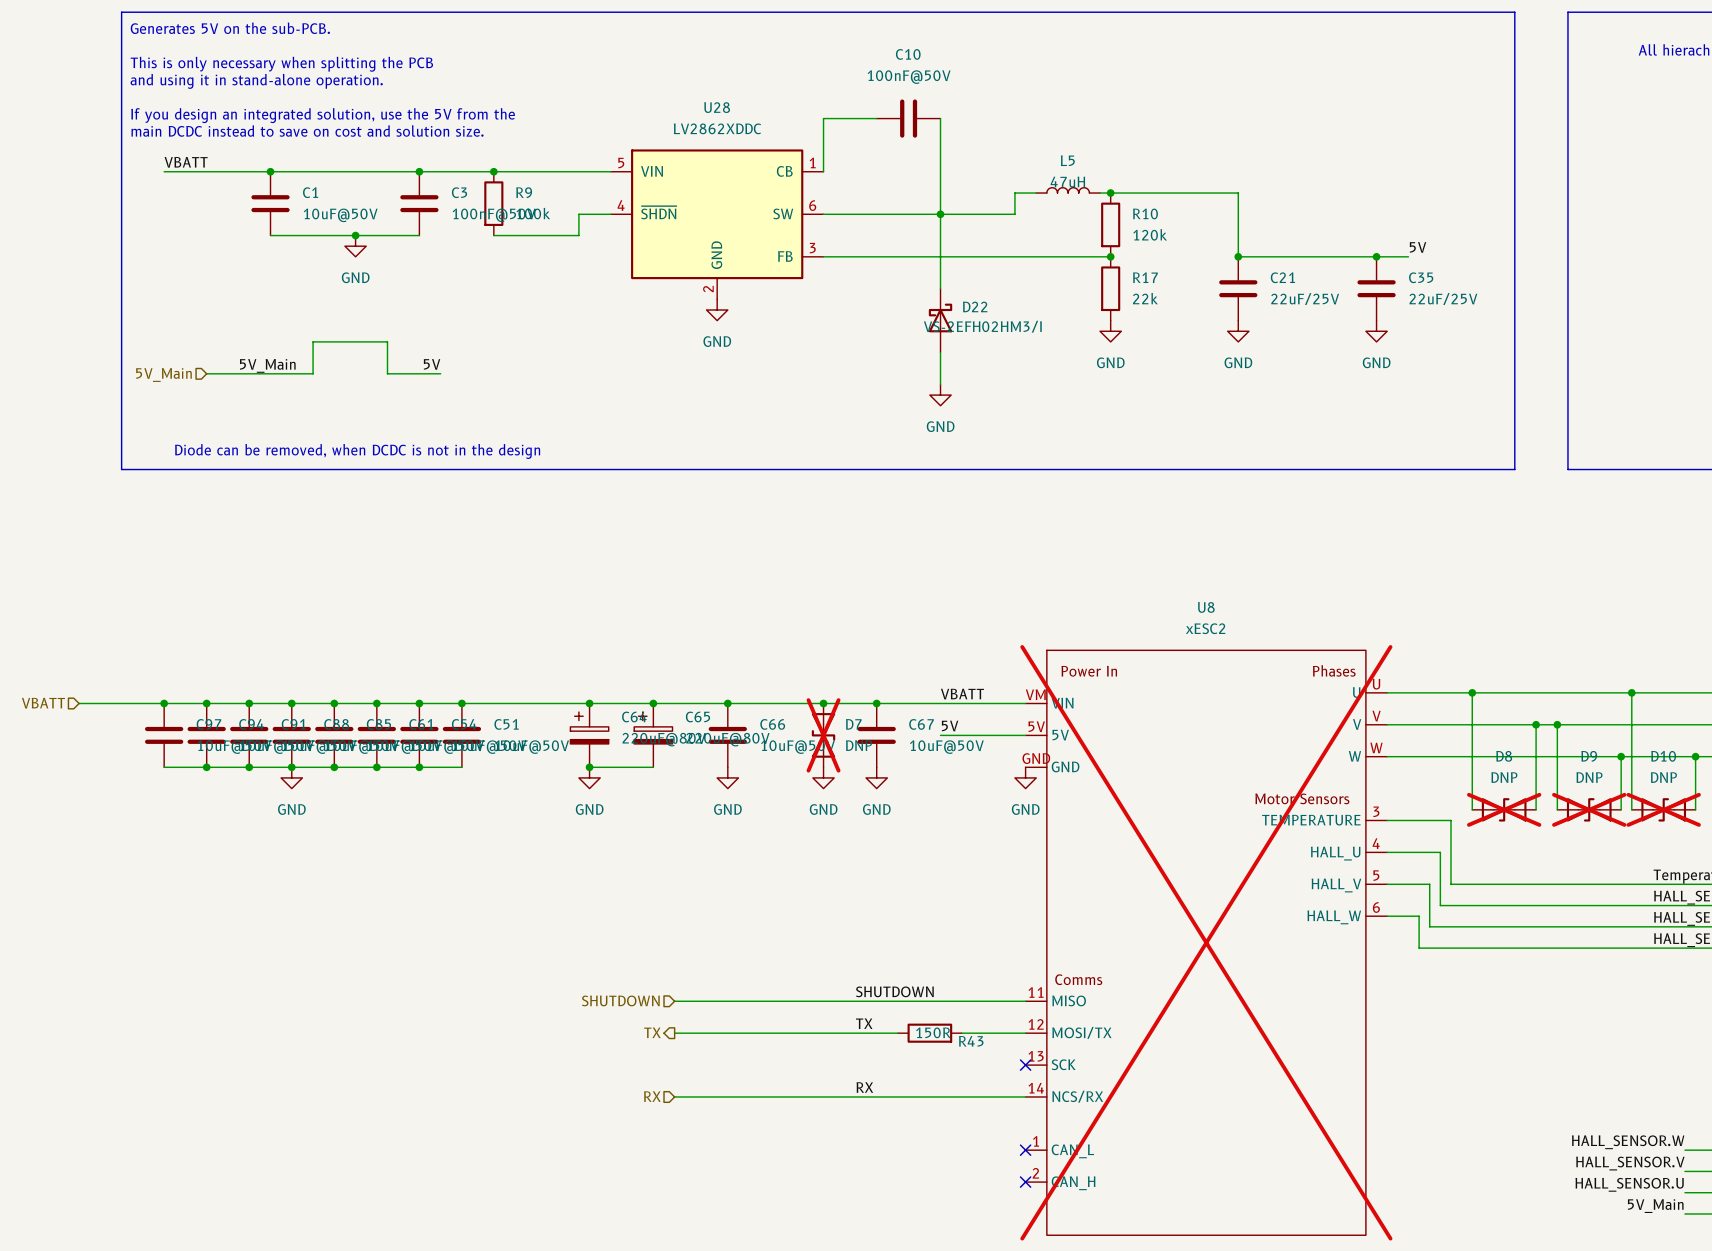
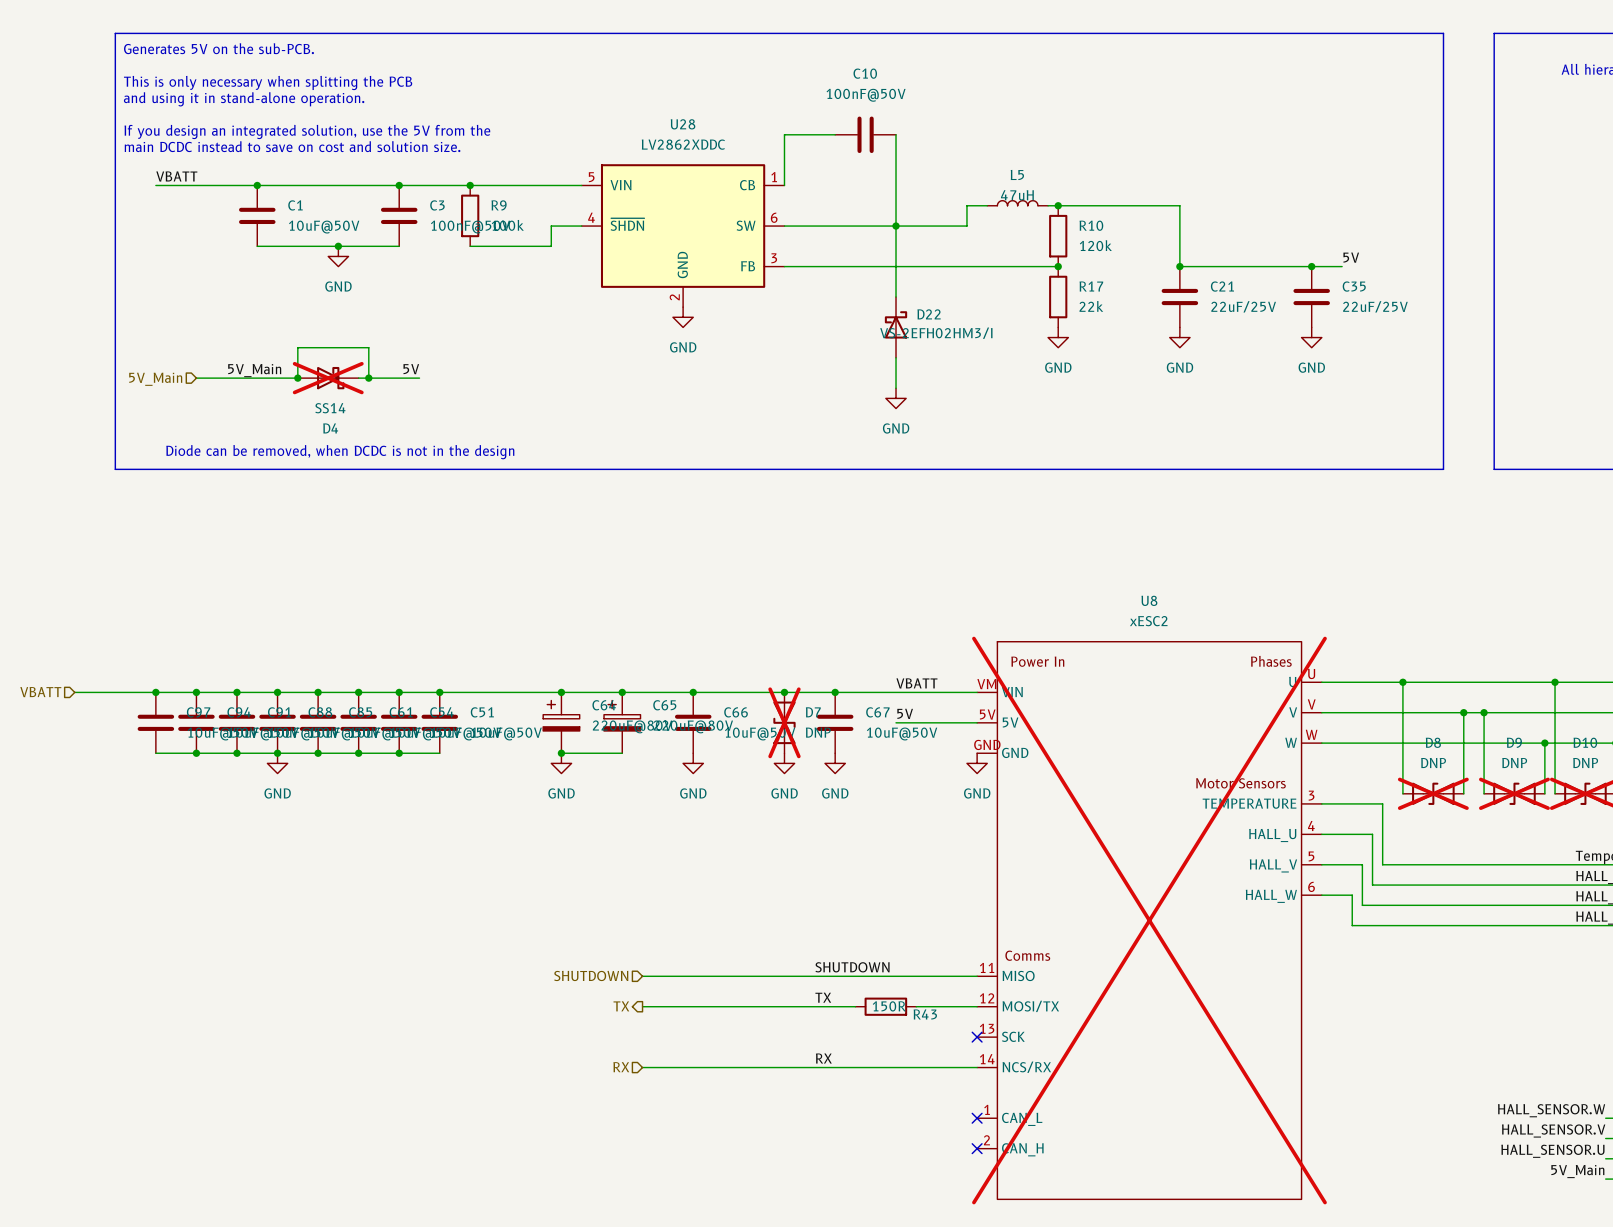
junction: none -> (297, 378)
D4: none -> SS14 (328, 378)
wire: none -> (358, 378) (368, 378)
junction: none -> (368, 378)

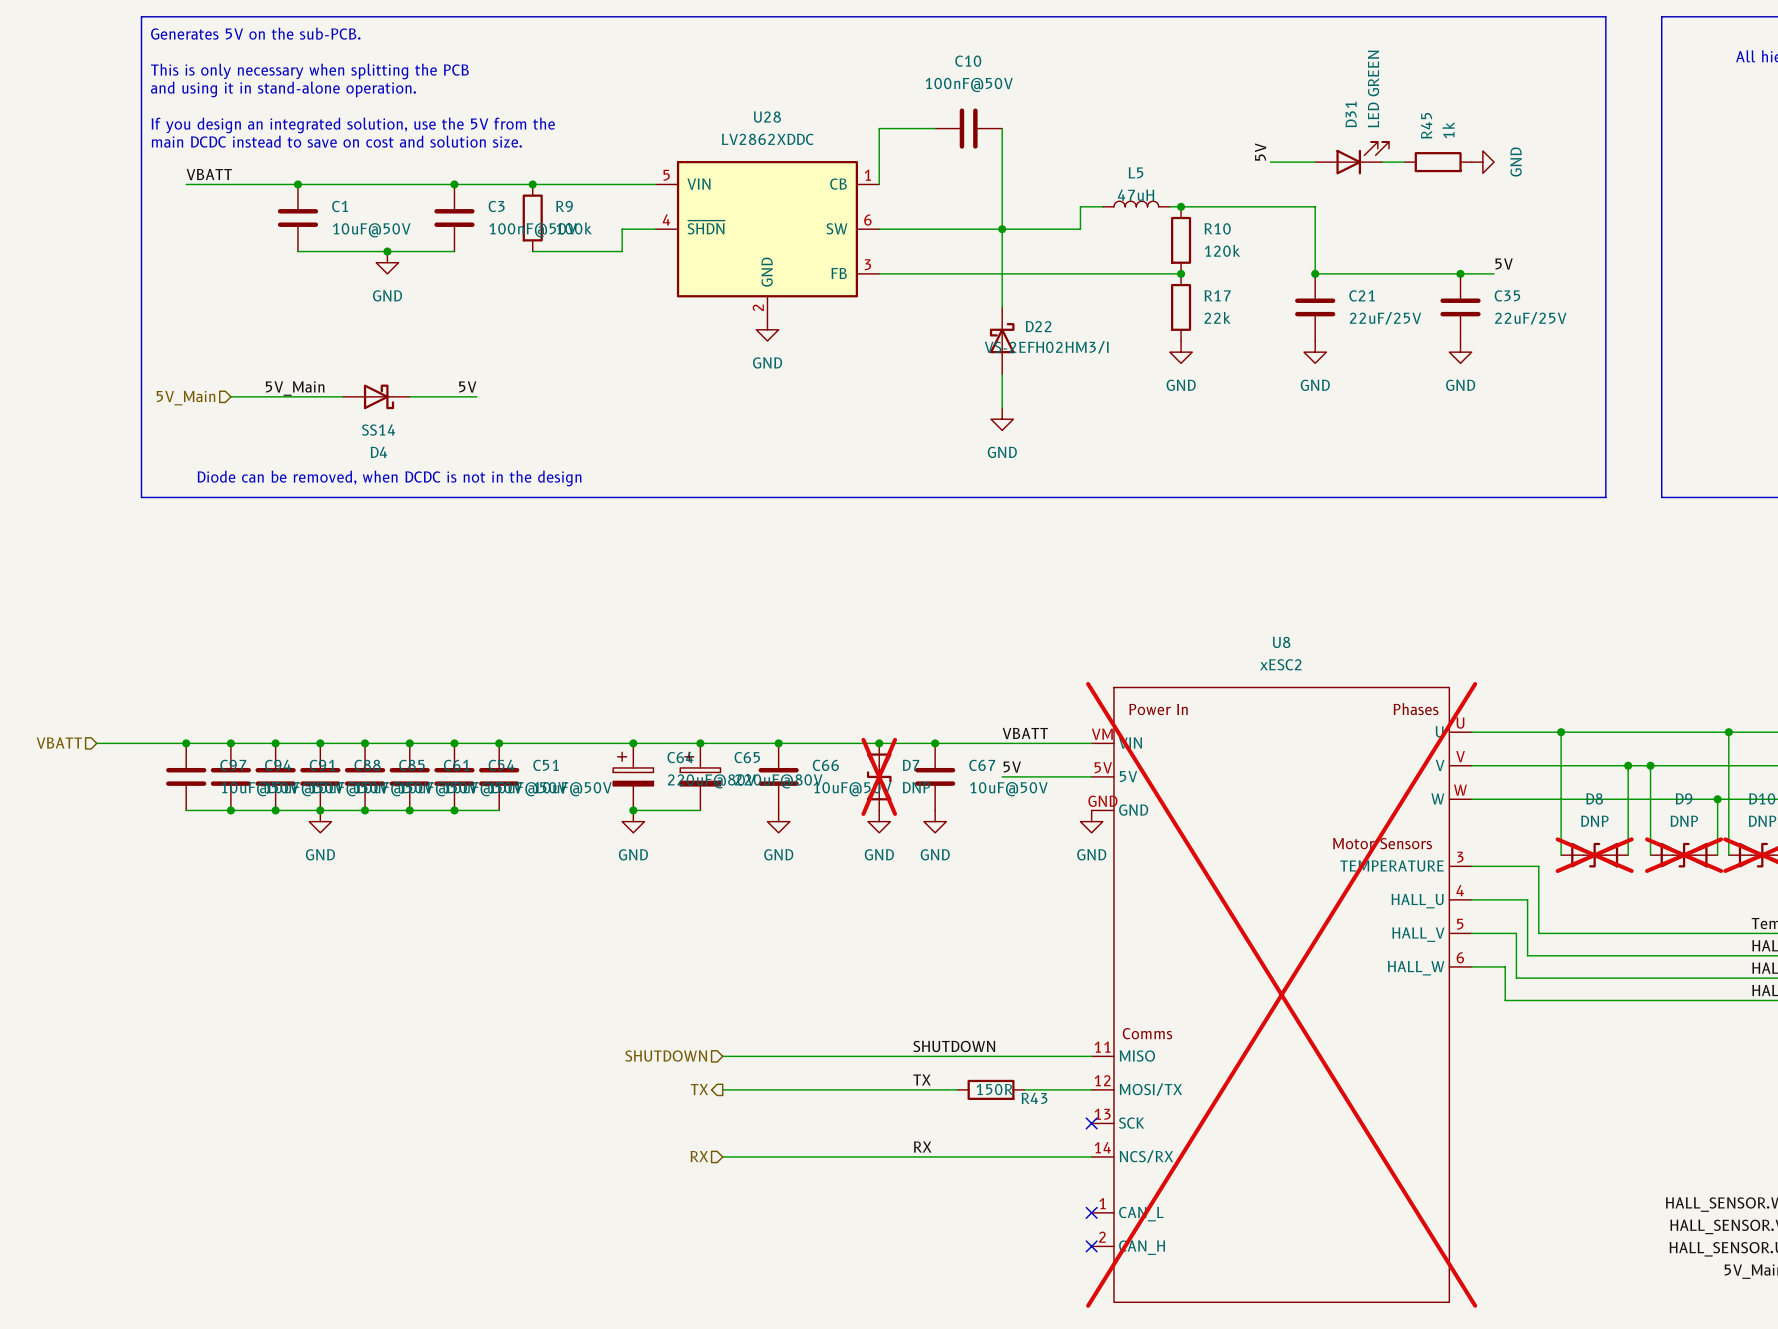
label: none -> 5V (1260, 152)
D31: none -> LED GREEN (1352, 158)
wire: none -> (1270, 162) (1315, 162)
wire: none -> (1382, 162) (1404, 162)
R45: none -> 1k (1438, 162)
power symbol: none -> GND (1482, 162)
wire: (297, 378) (297, 347) (368, 347) (368, 378) -> none
junction: (297, 378) -> none
D4 do-not-place cross: (328, 378) -> none
junction: (368, 378) -> none

